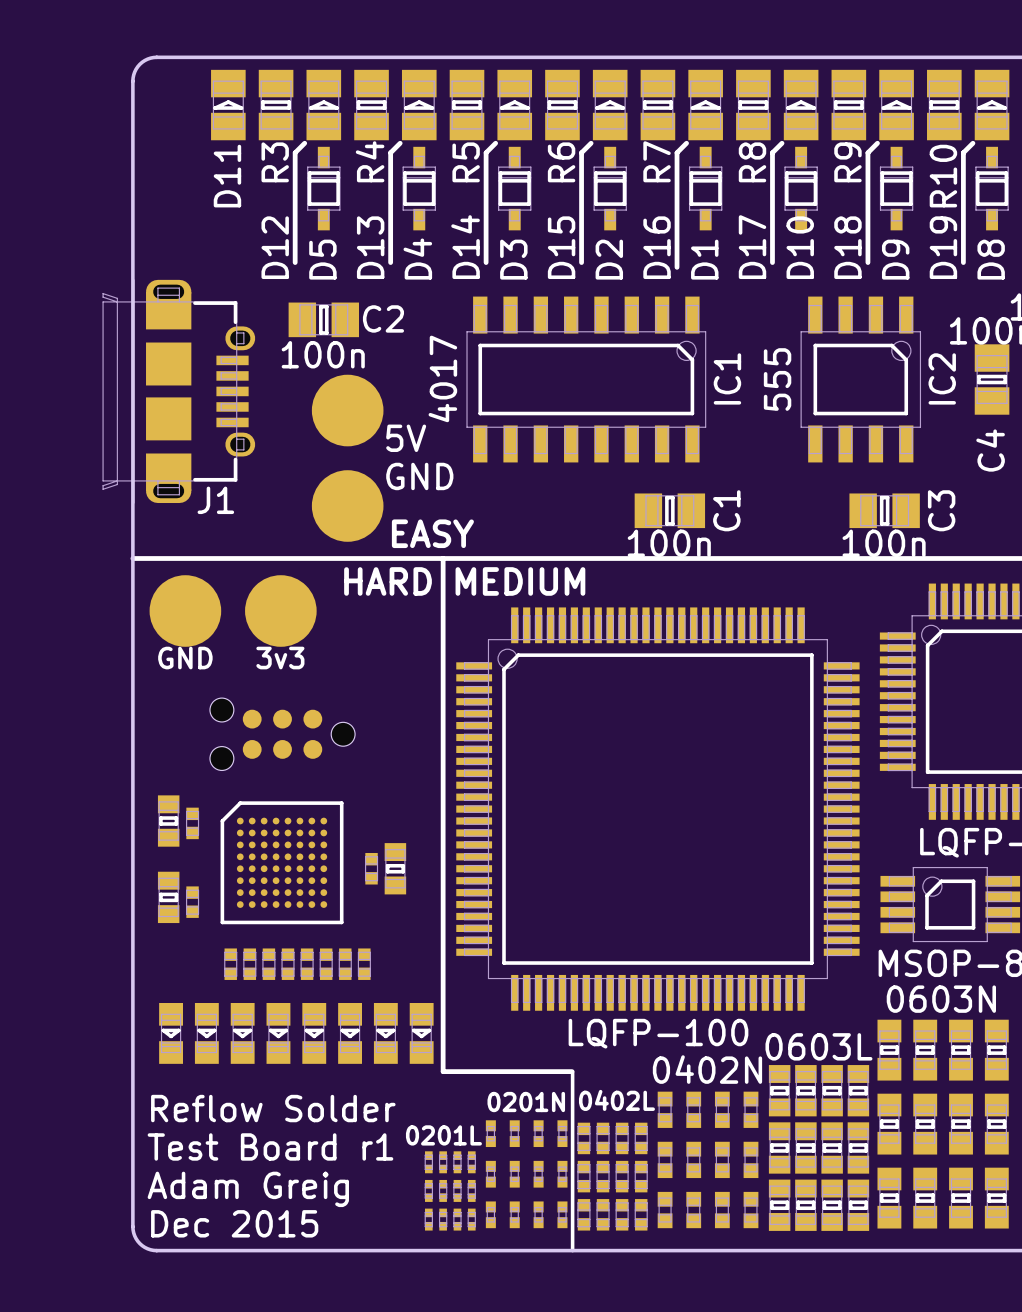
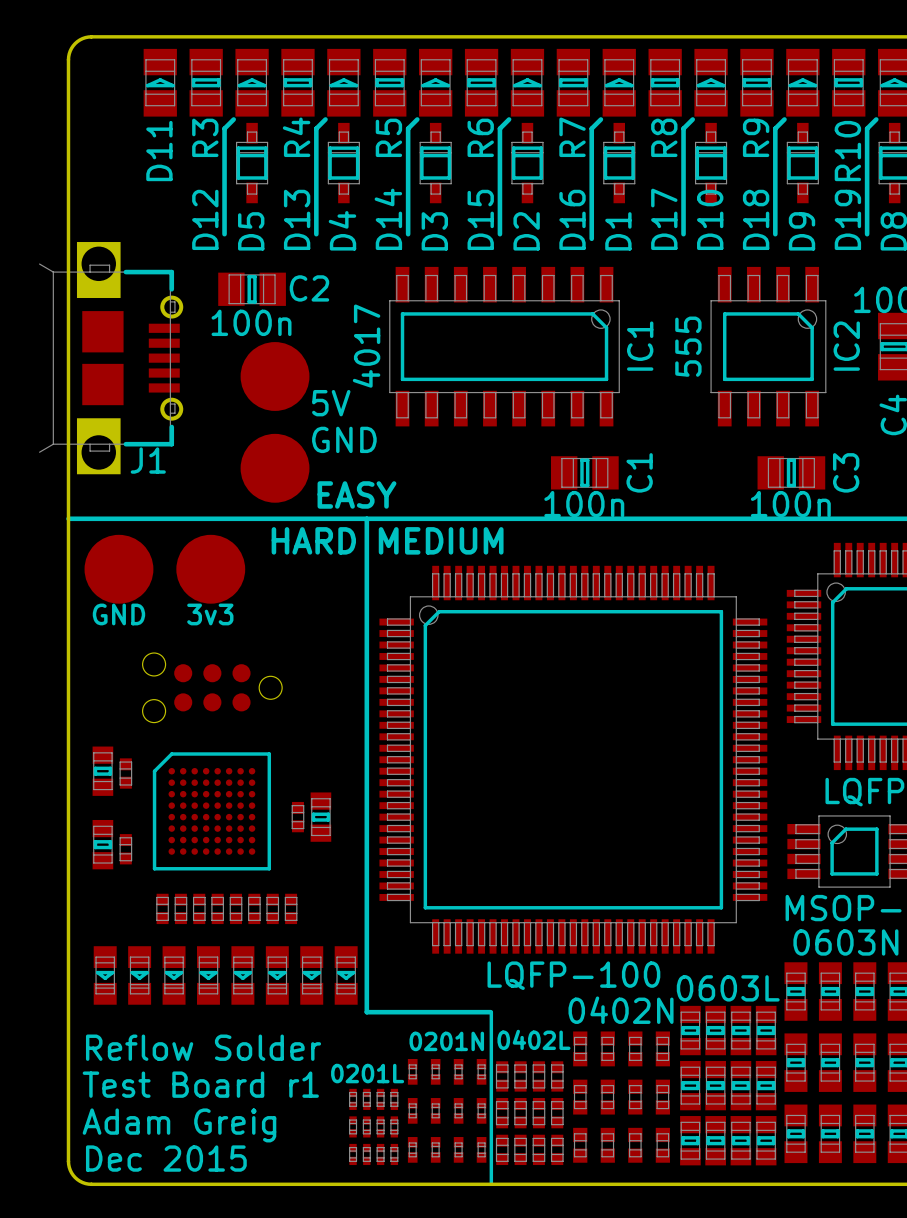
J1 footprint: [102, 279, 256, 504] -> [39, 237, 184, 479]
line: none -> (125, 272) (171, 272) (171, 289)
line: none -> (171, 426) (171, 444) (125, 444)

